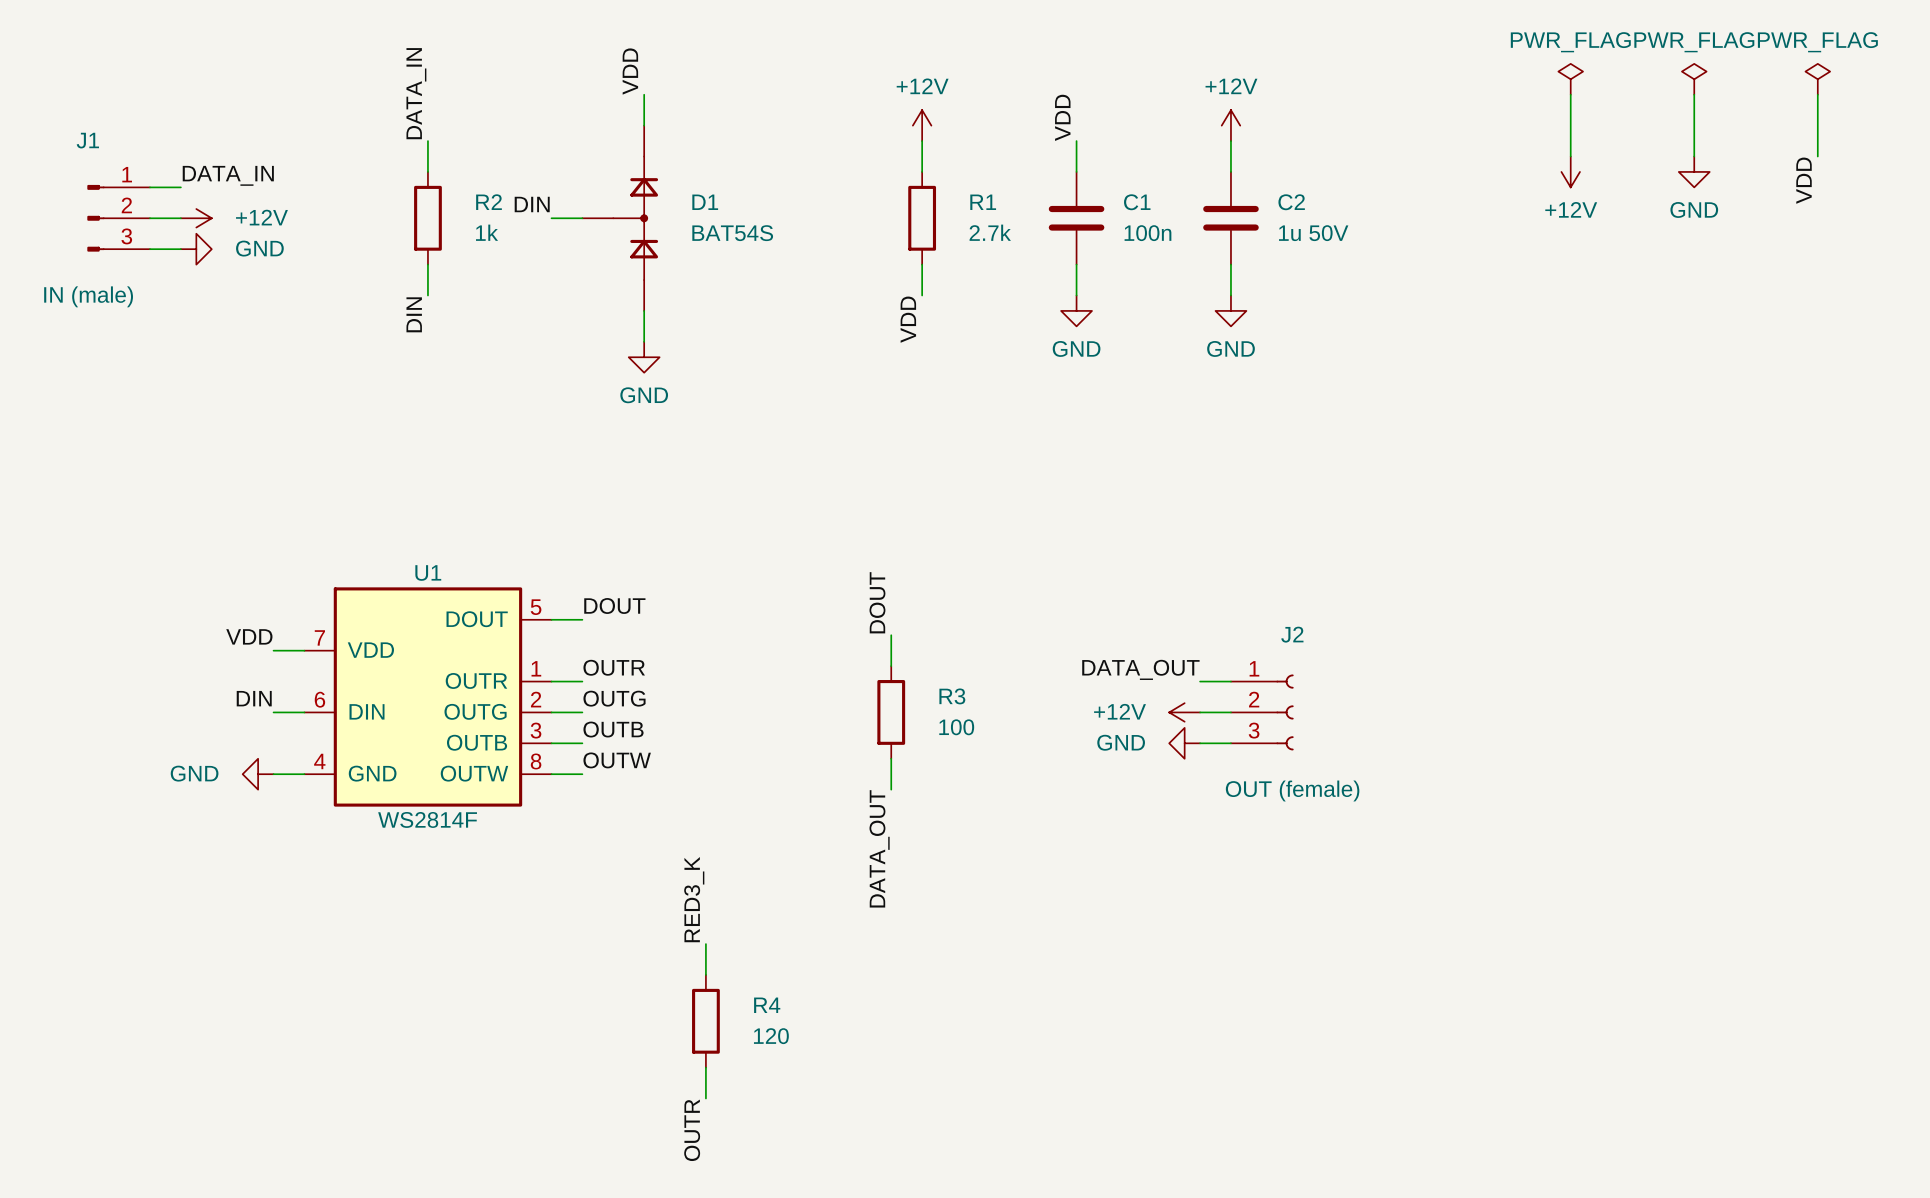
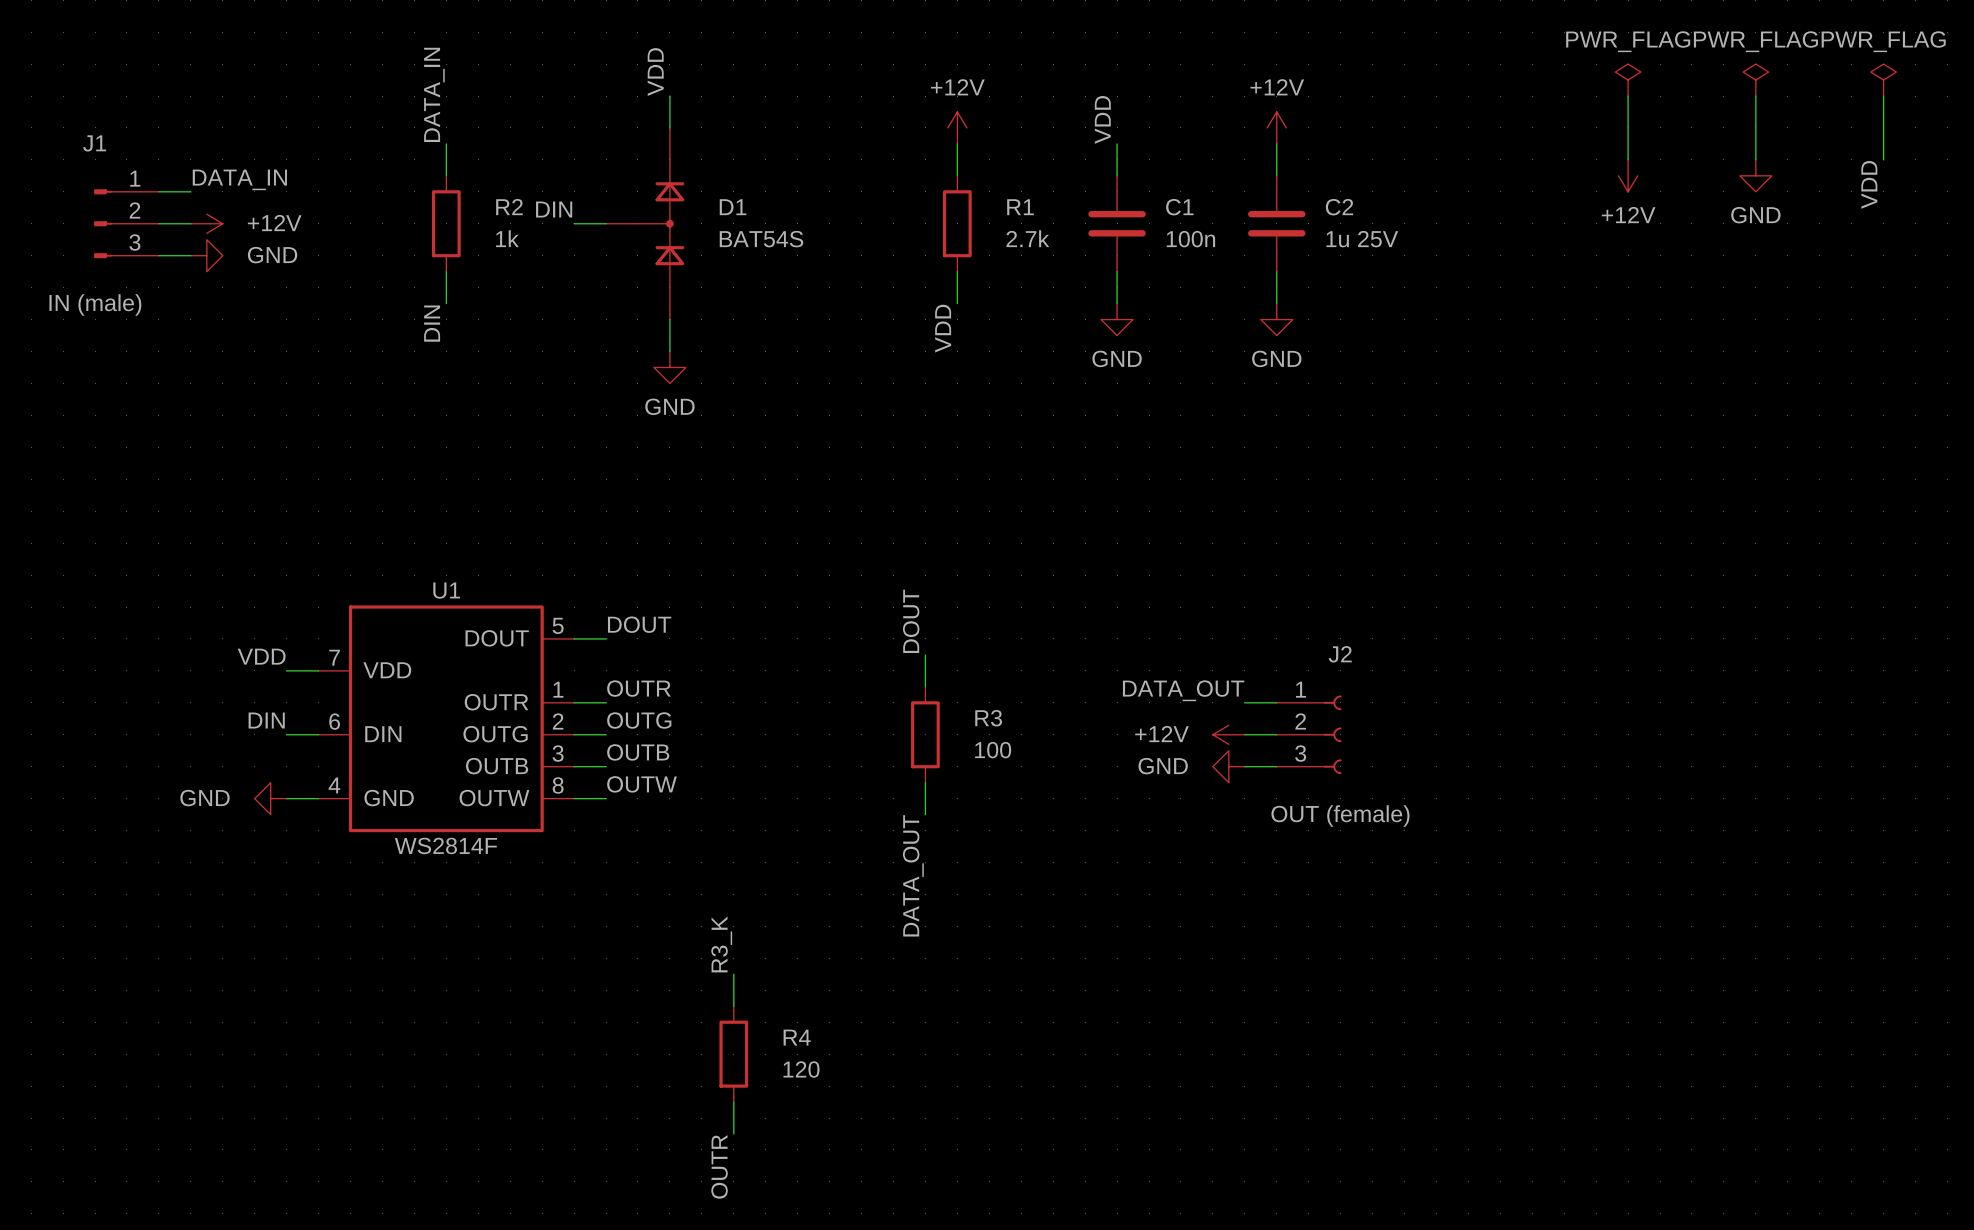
C2 value: 1u 50V (1313, 233) -> 1u 25V (1362, 239)
label: RED3_K (694, 899) -> R3_K (721, 944)

